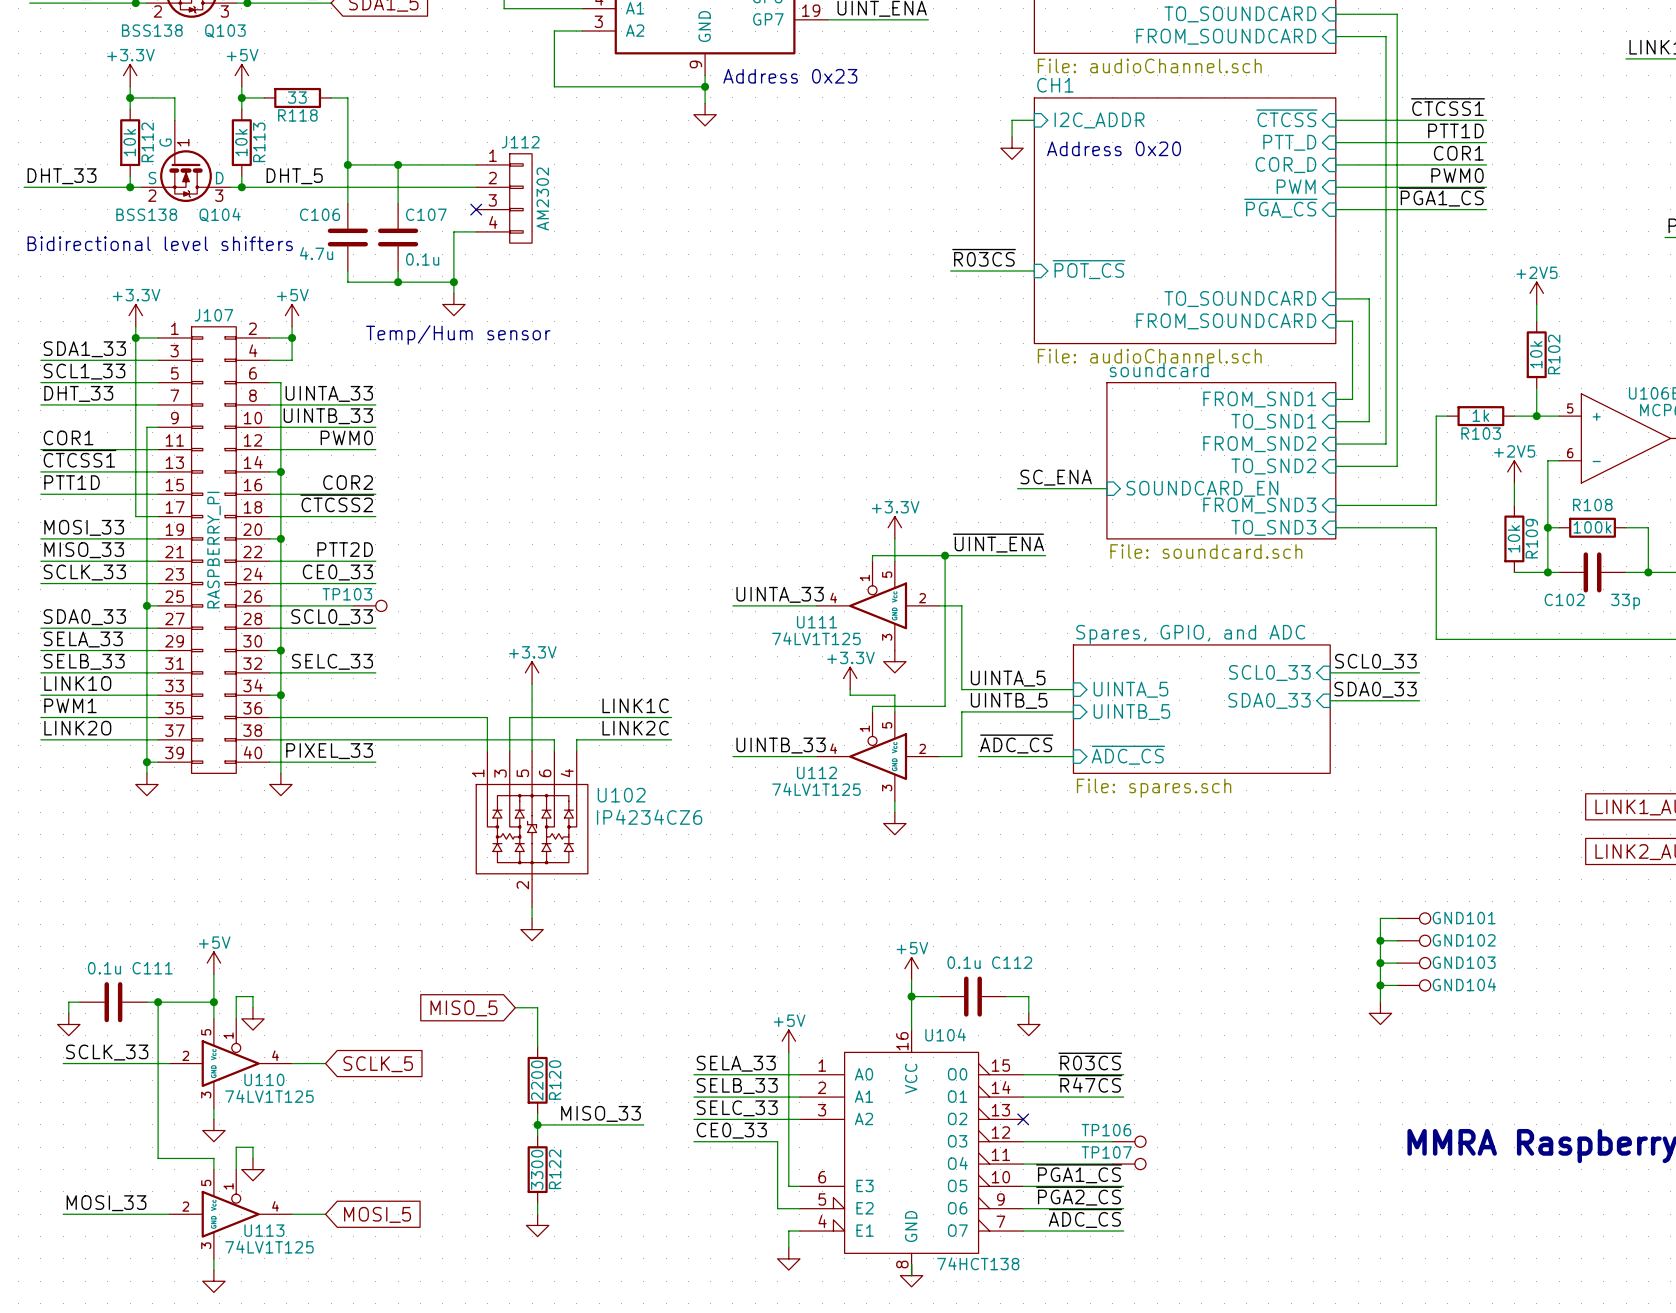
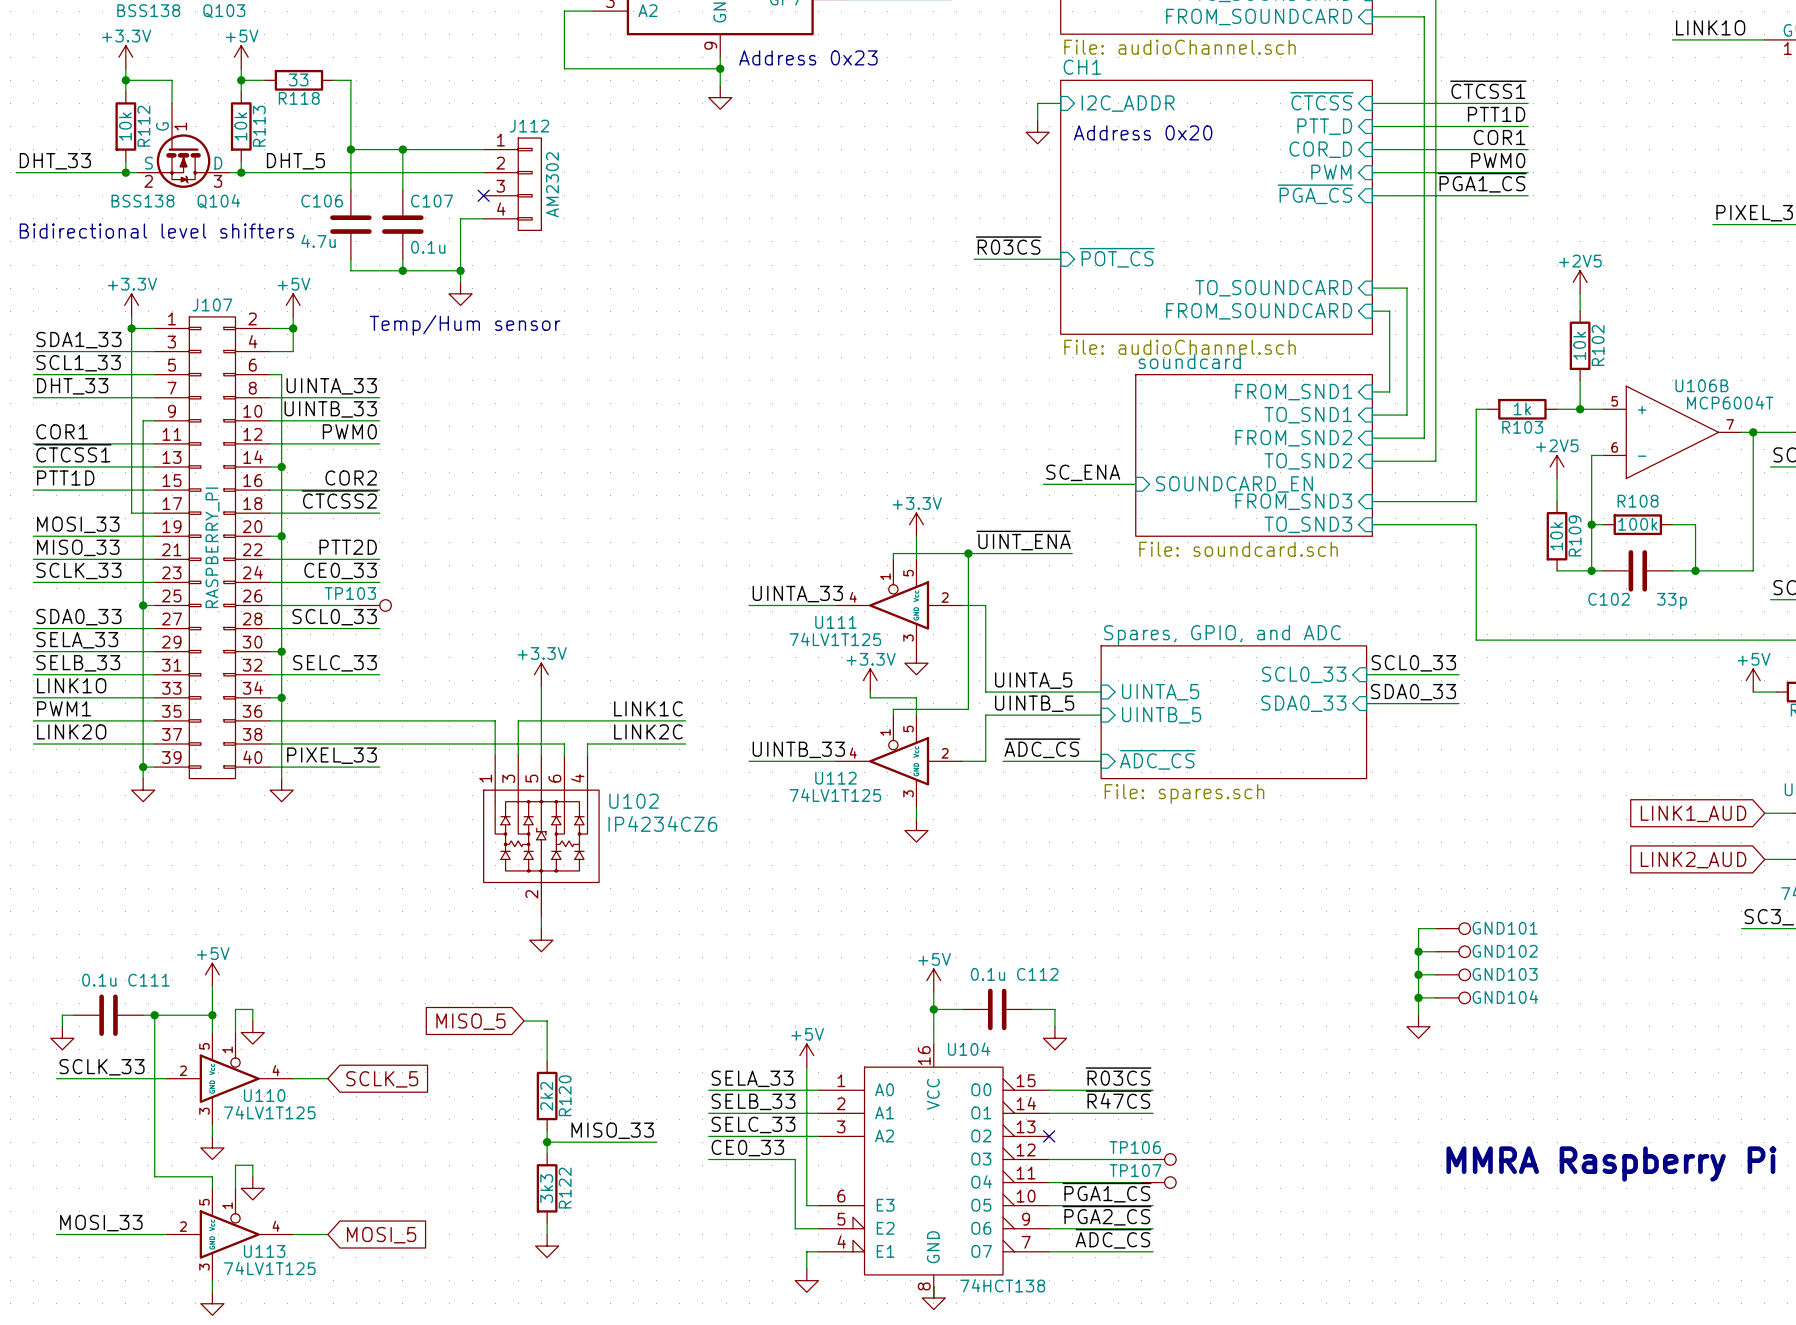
R120 value: 2200 (537, 1080) -> 2k2 (546, 1096)
R122 value: 3300 (537, 1169) -> 3k3 (546, 1188)

